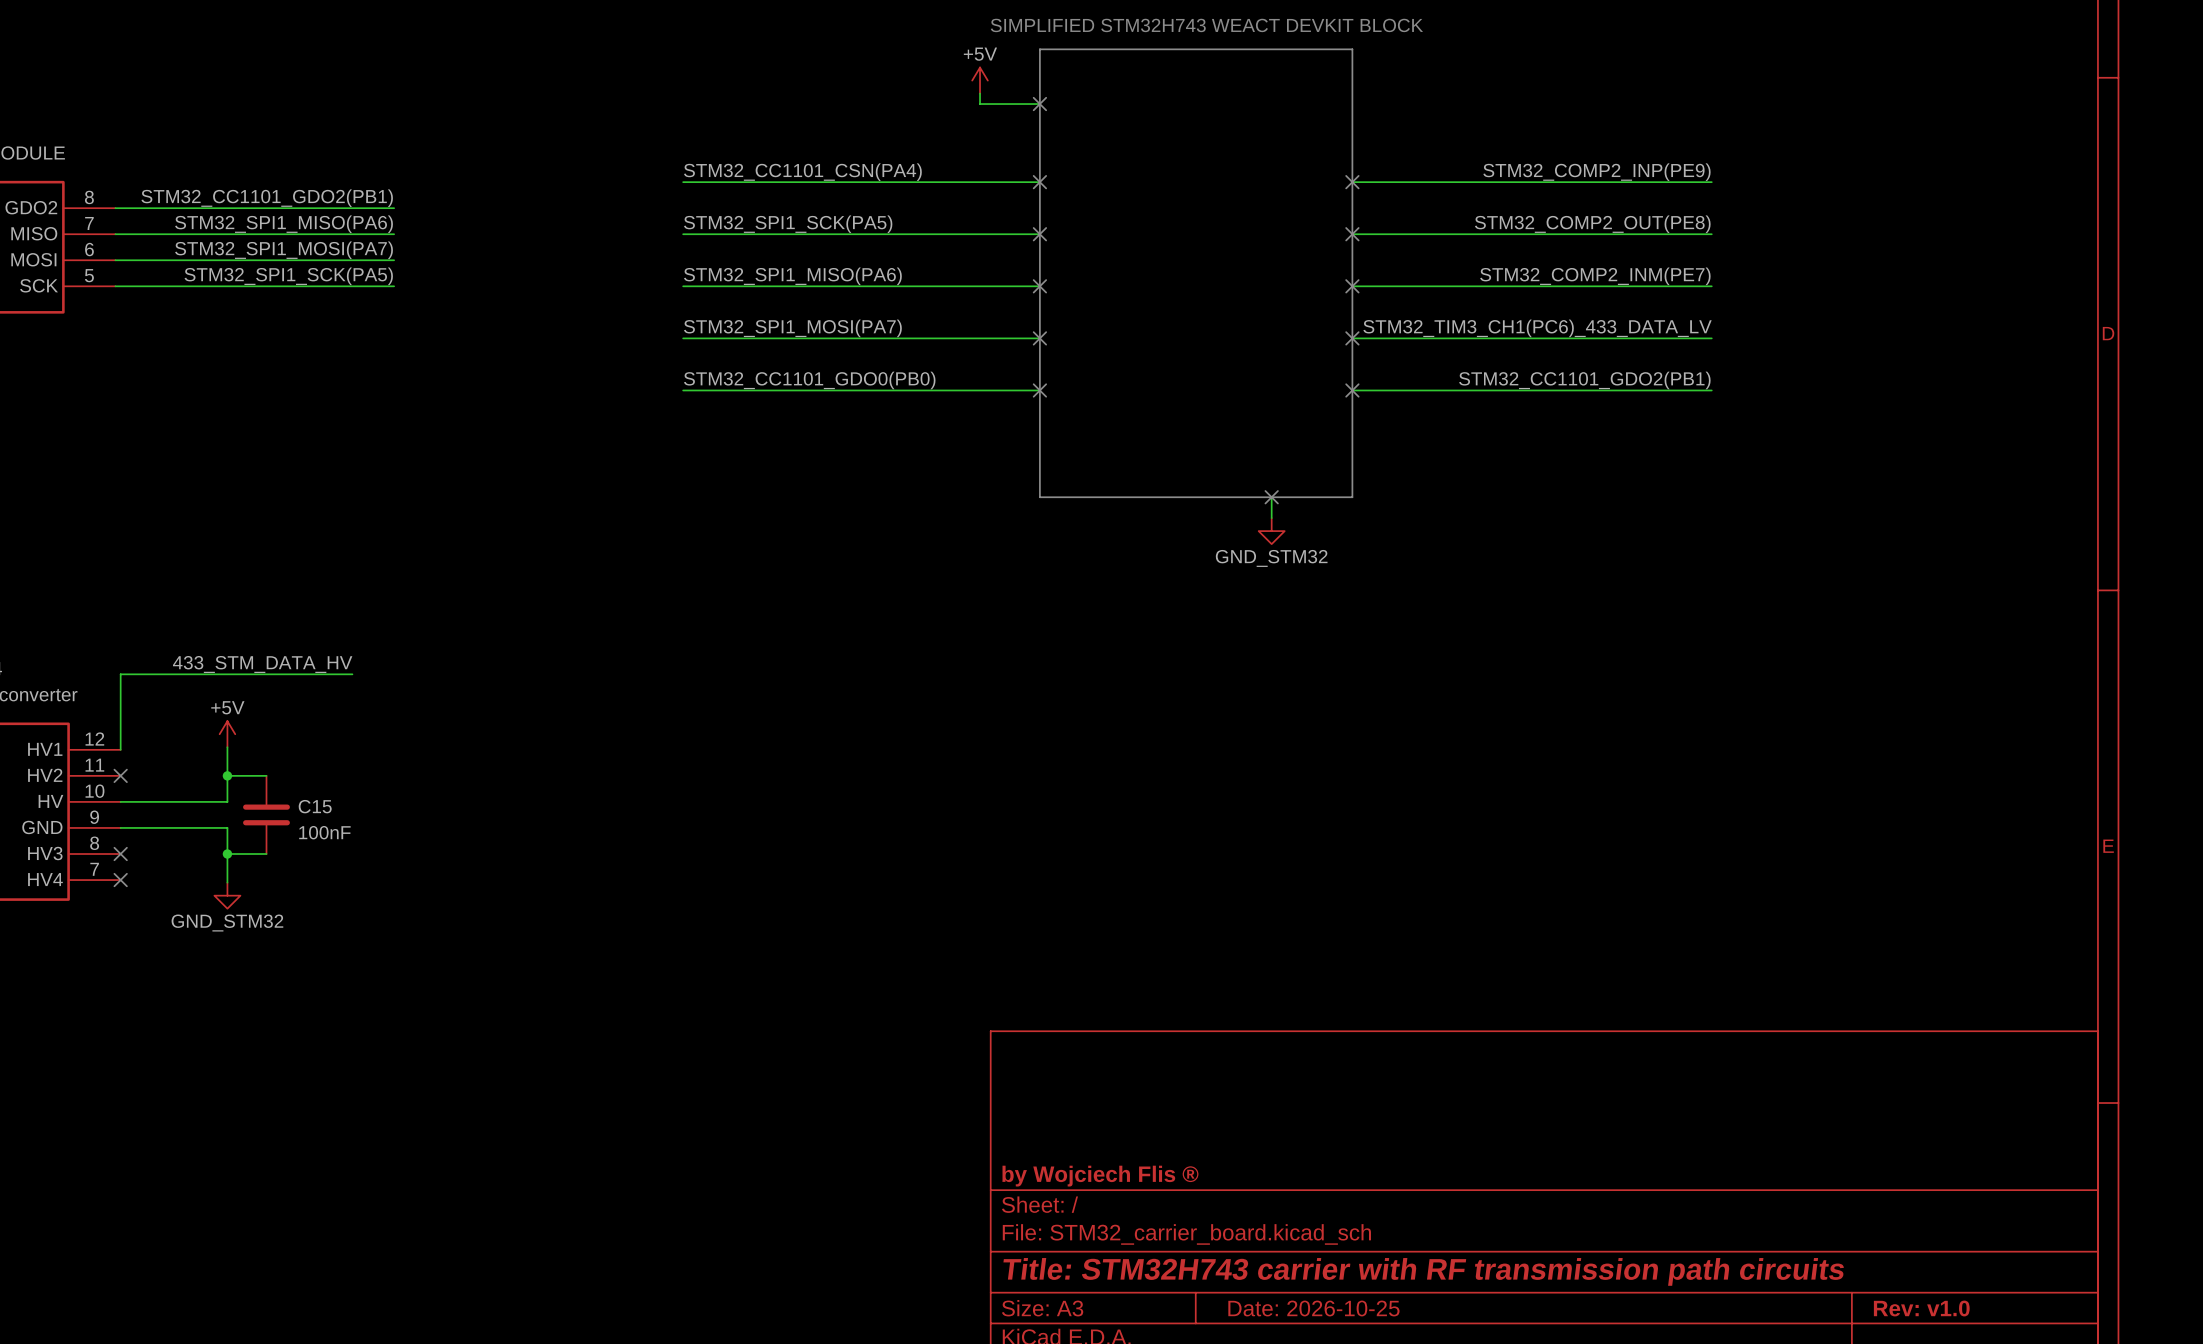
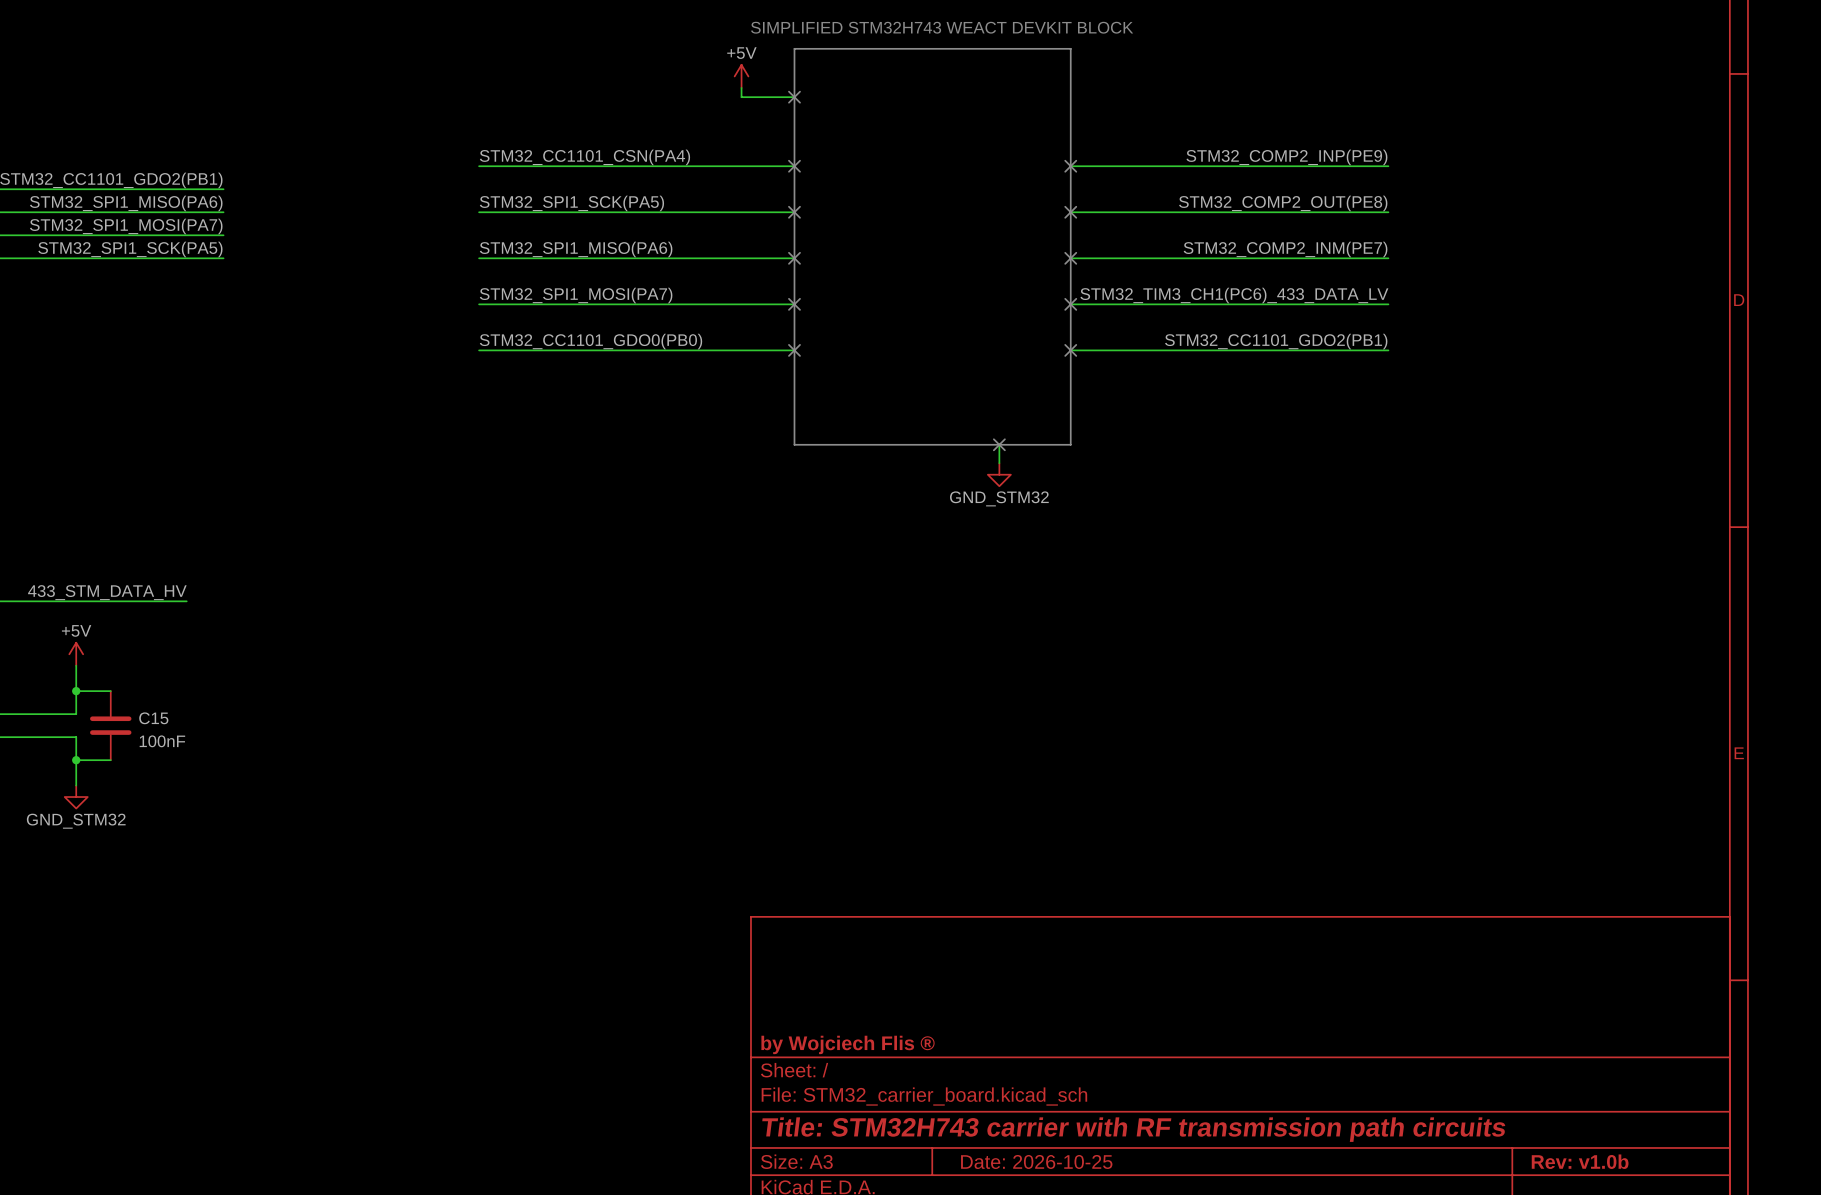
title block: Rev: v1.0 (1921, 1308) -> Rev: v1.0b (1580, 1161)

